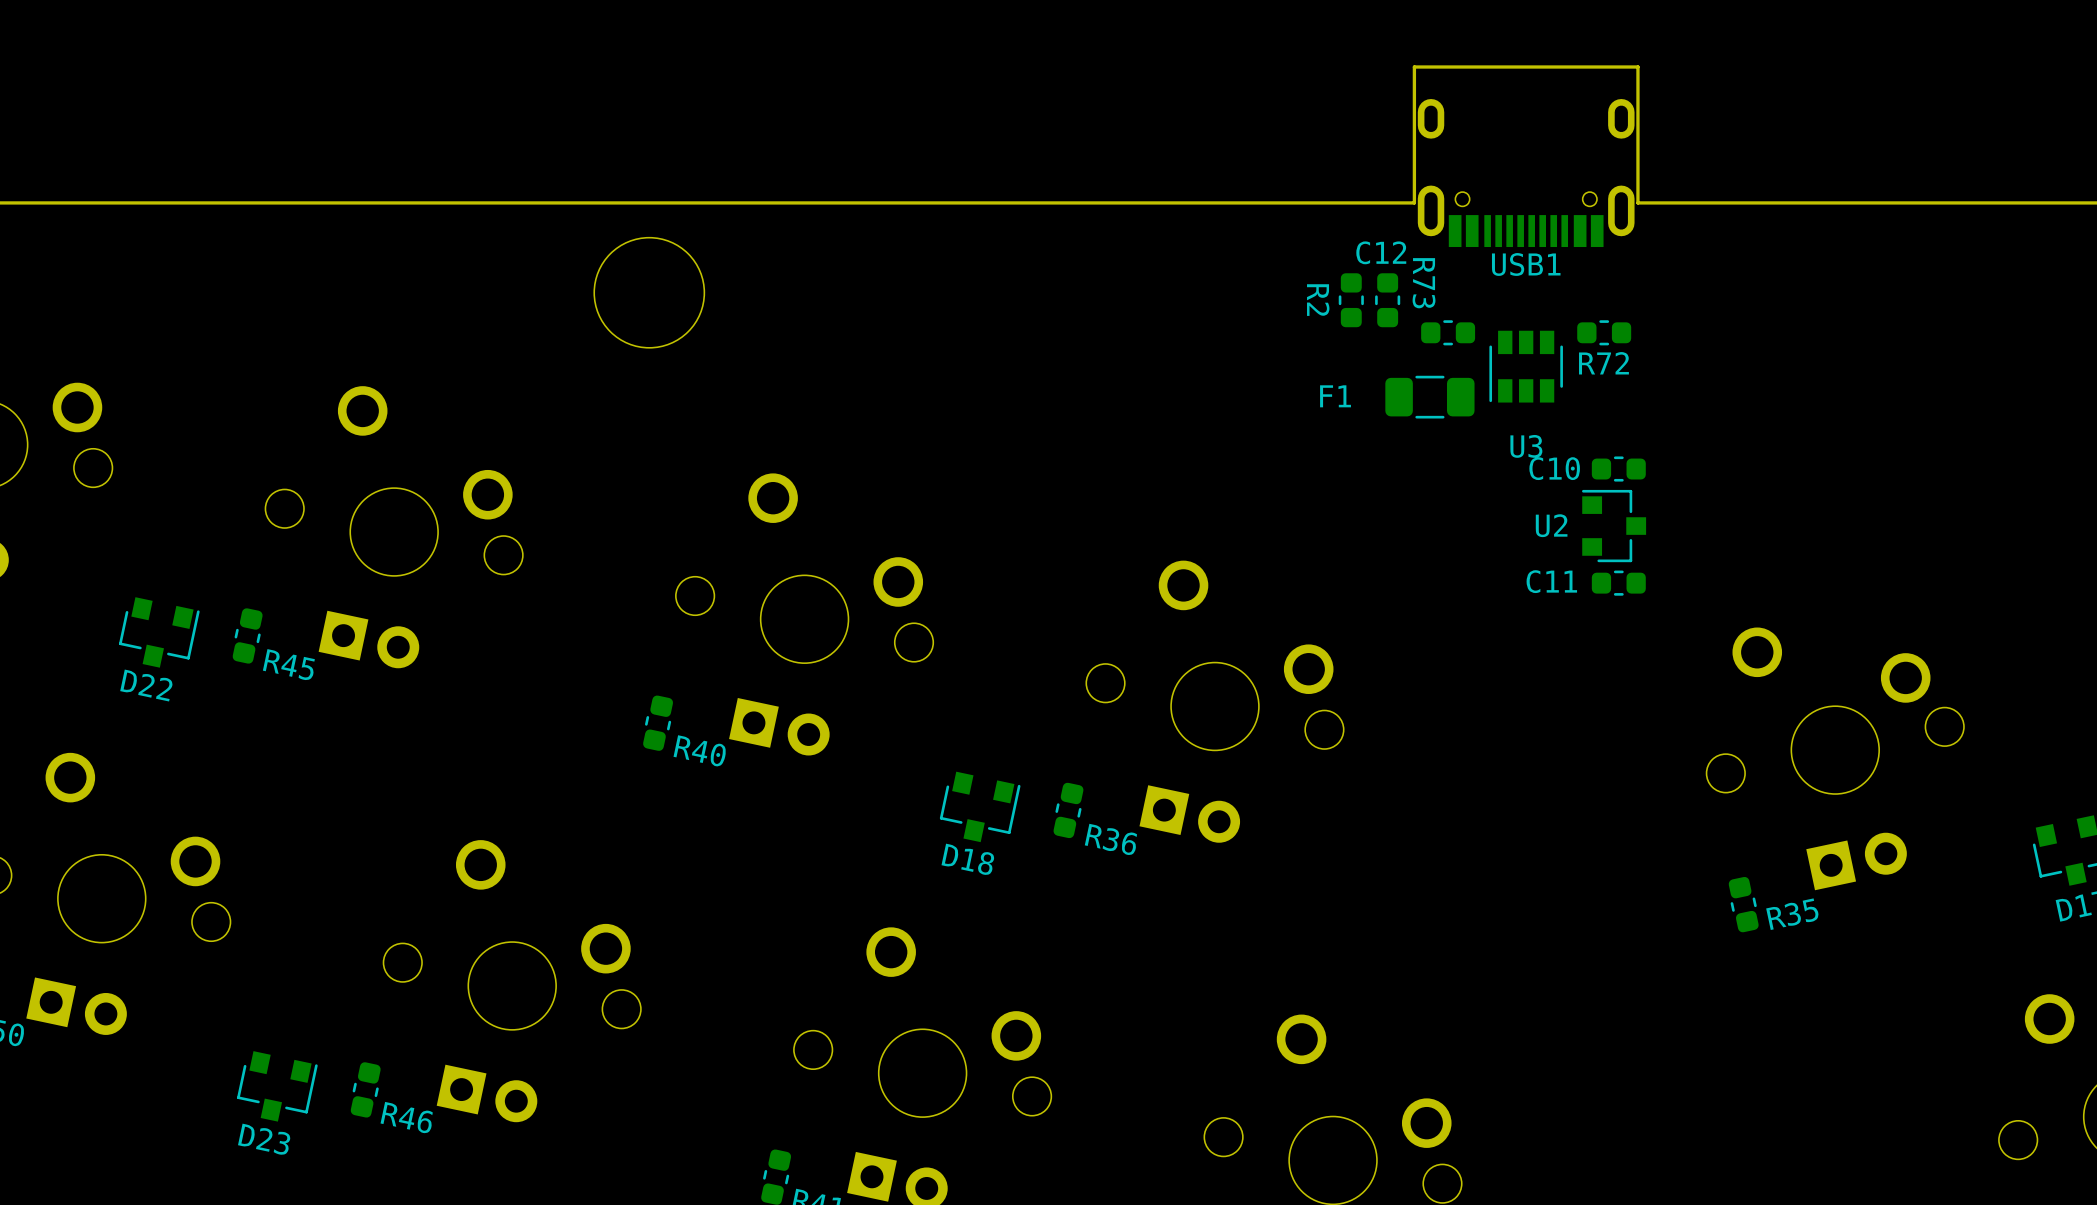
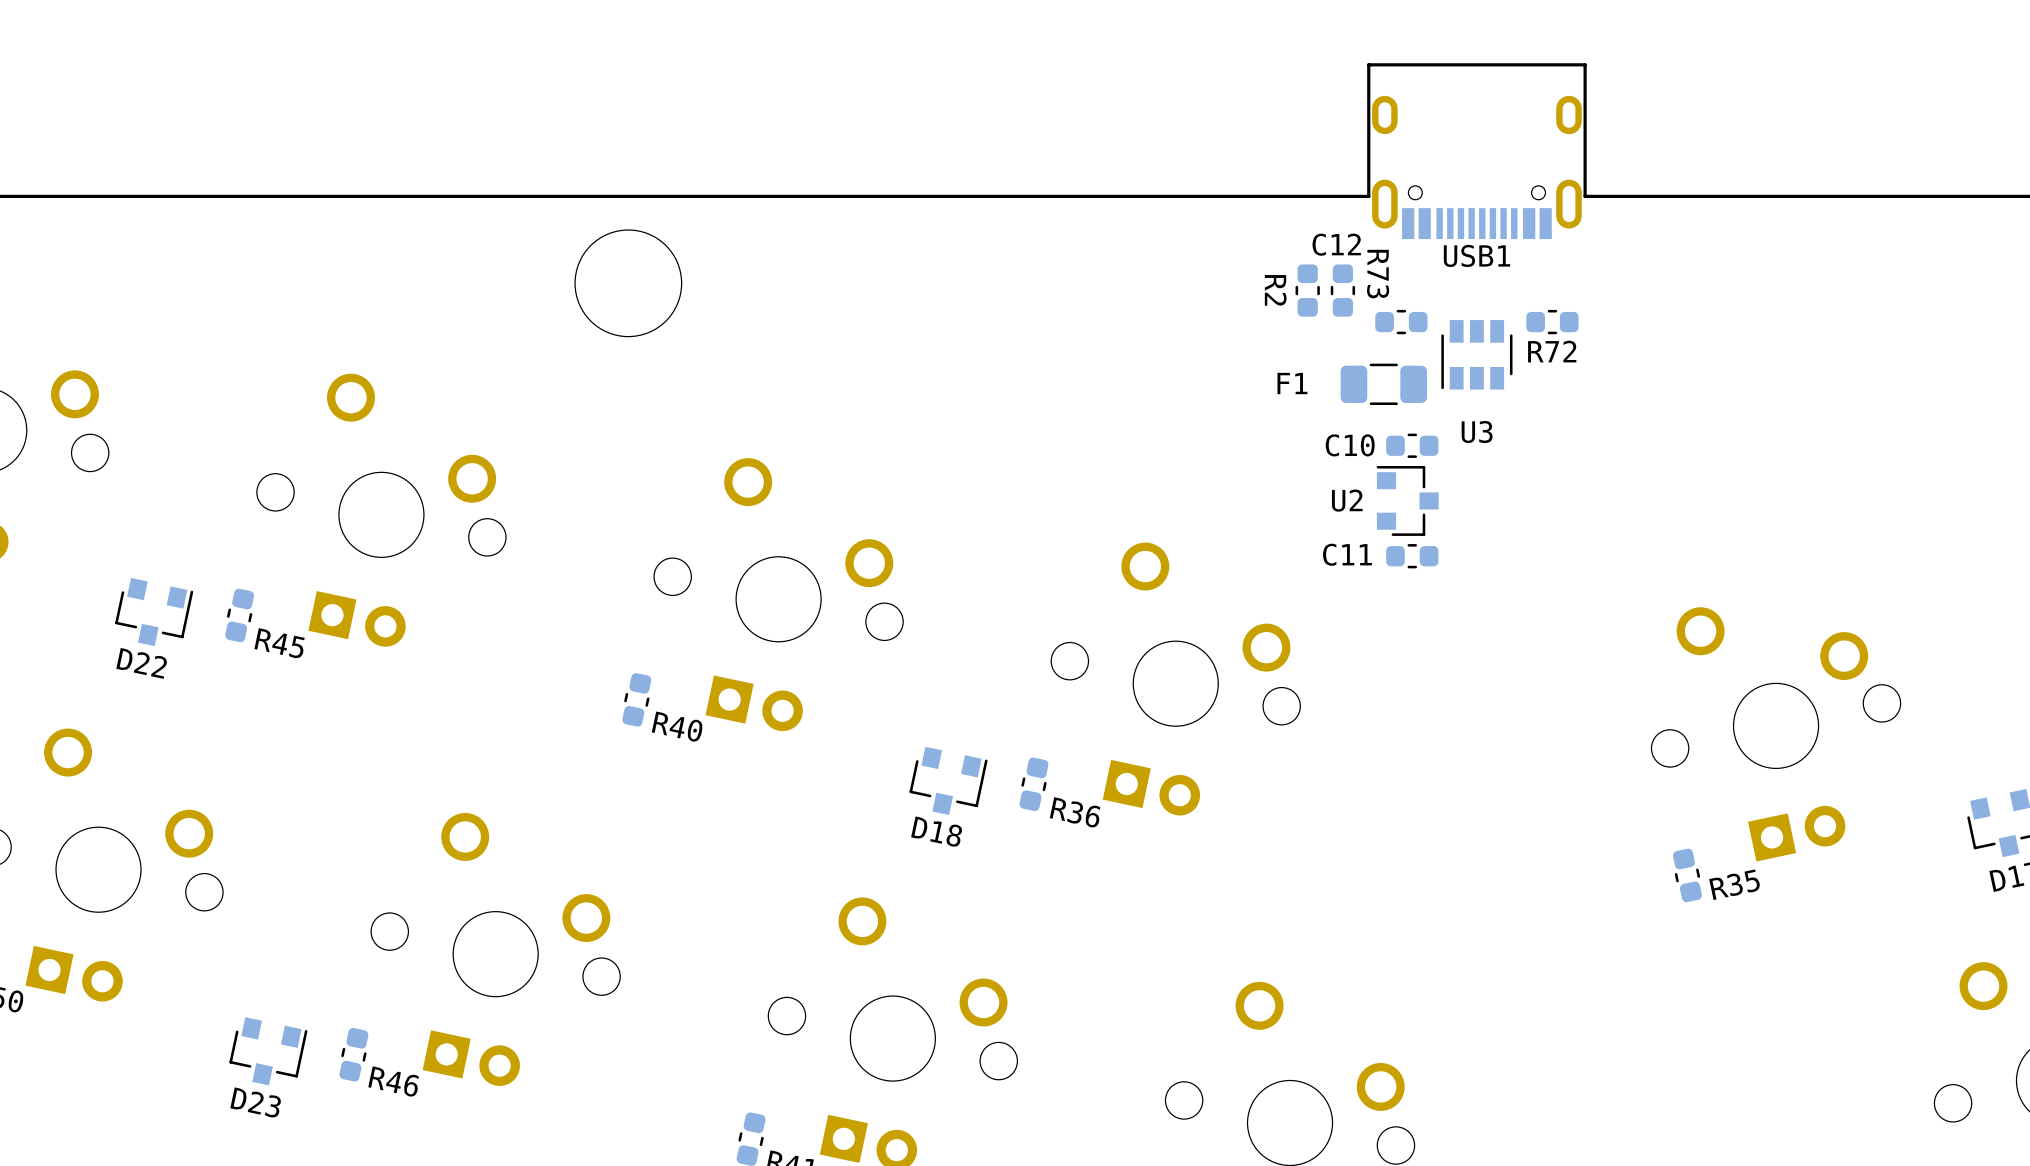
C10 position: (1618, 469) -> (1412, 445)
U2 position: (1614, 526) -> (1407, 500)
C11 position: (1618, 583) -> (1412, 556)

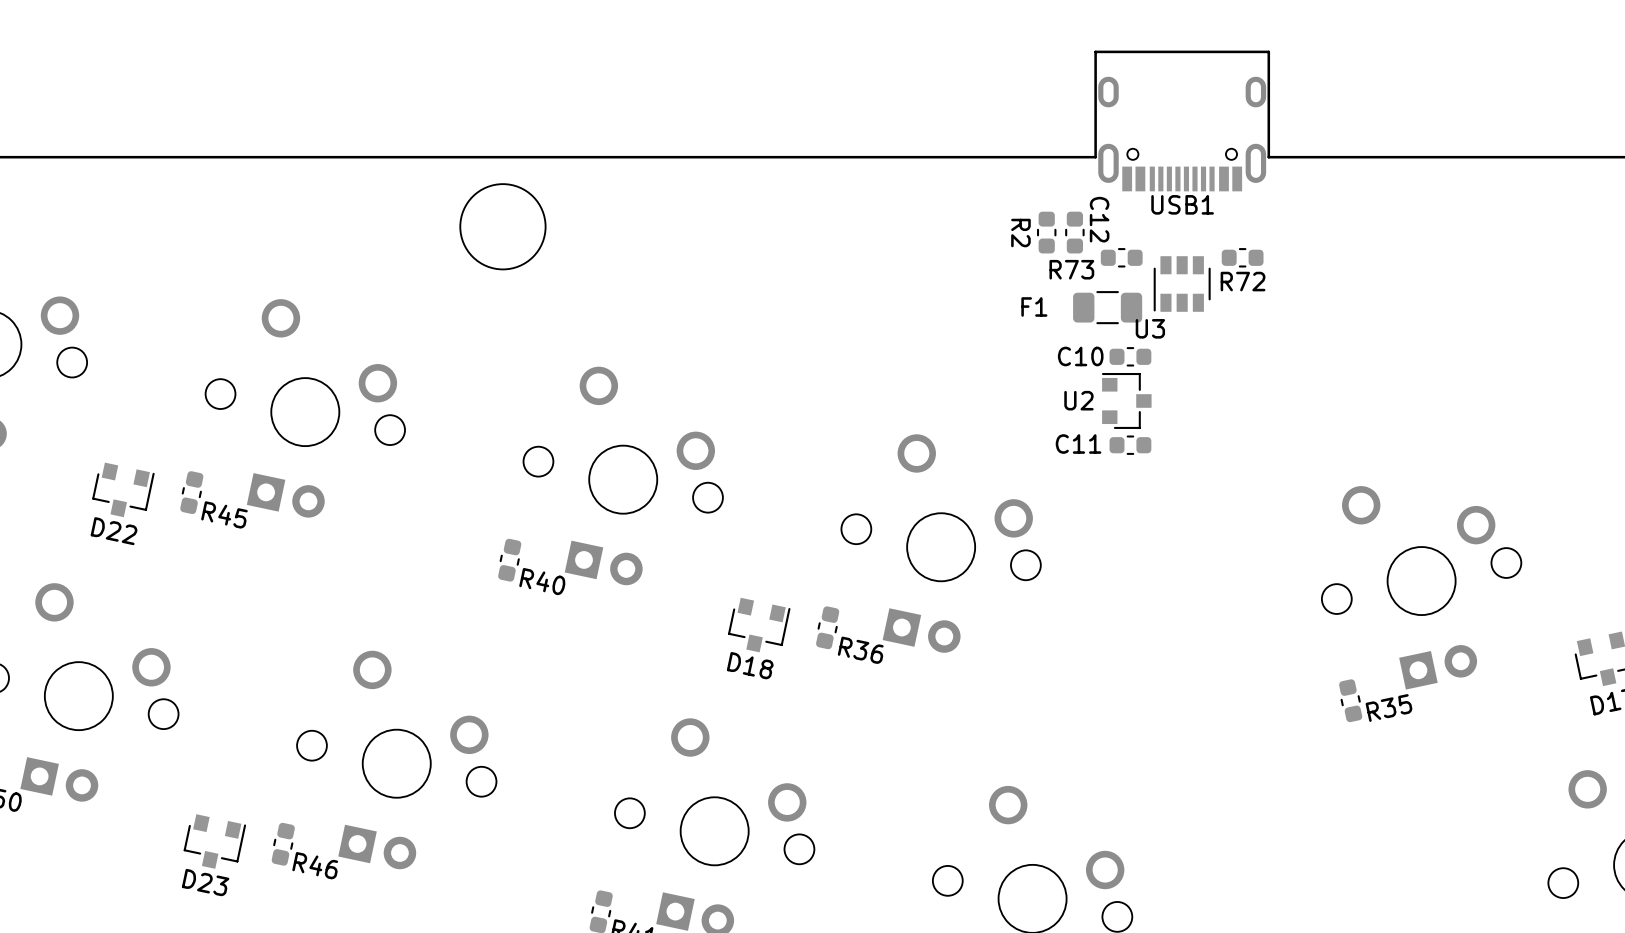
C12 name rotation: 0° (1336, 244) -> 90° clockwise (1099, 219)
R73 name rotation: 0° (1378, 274) -> 90° counterclockwise (1071, 269)
U3 name position: U3 (1477, 431) -> U3 (1150, 328)

